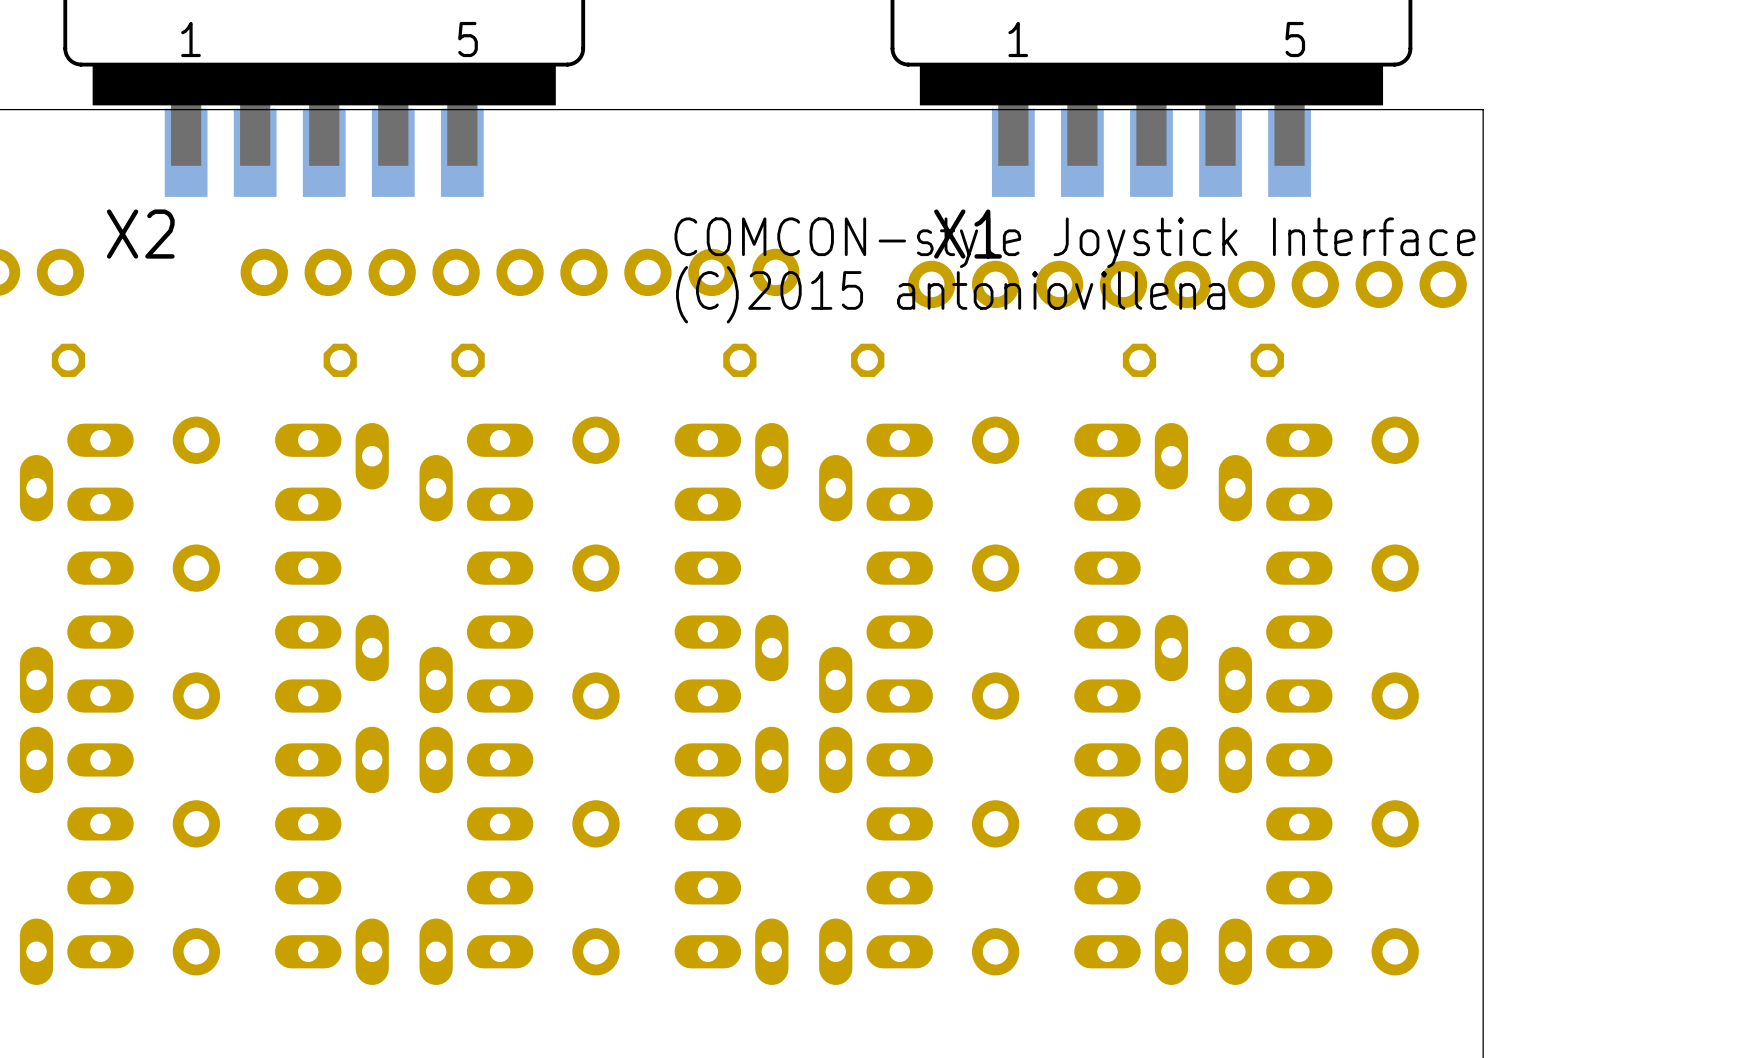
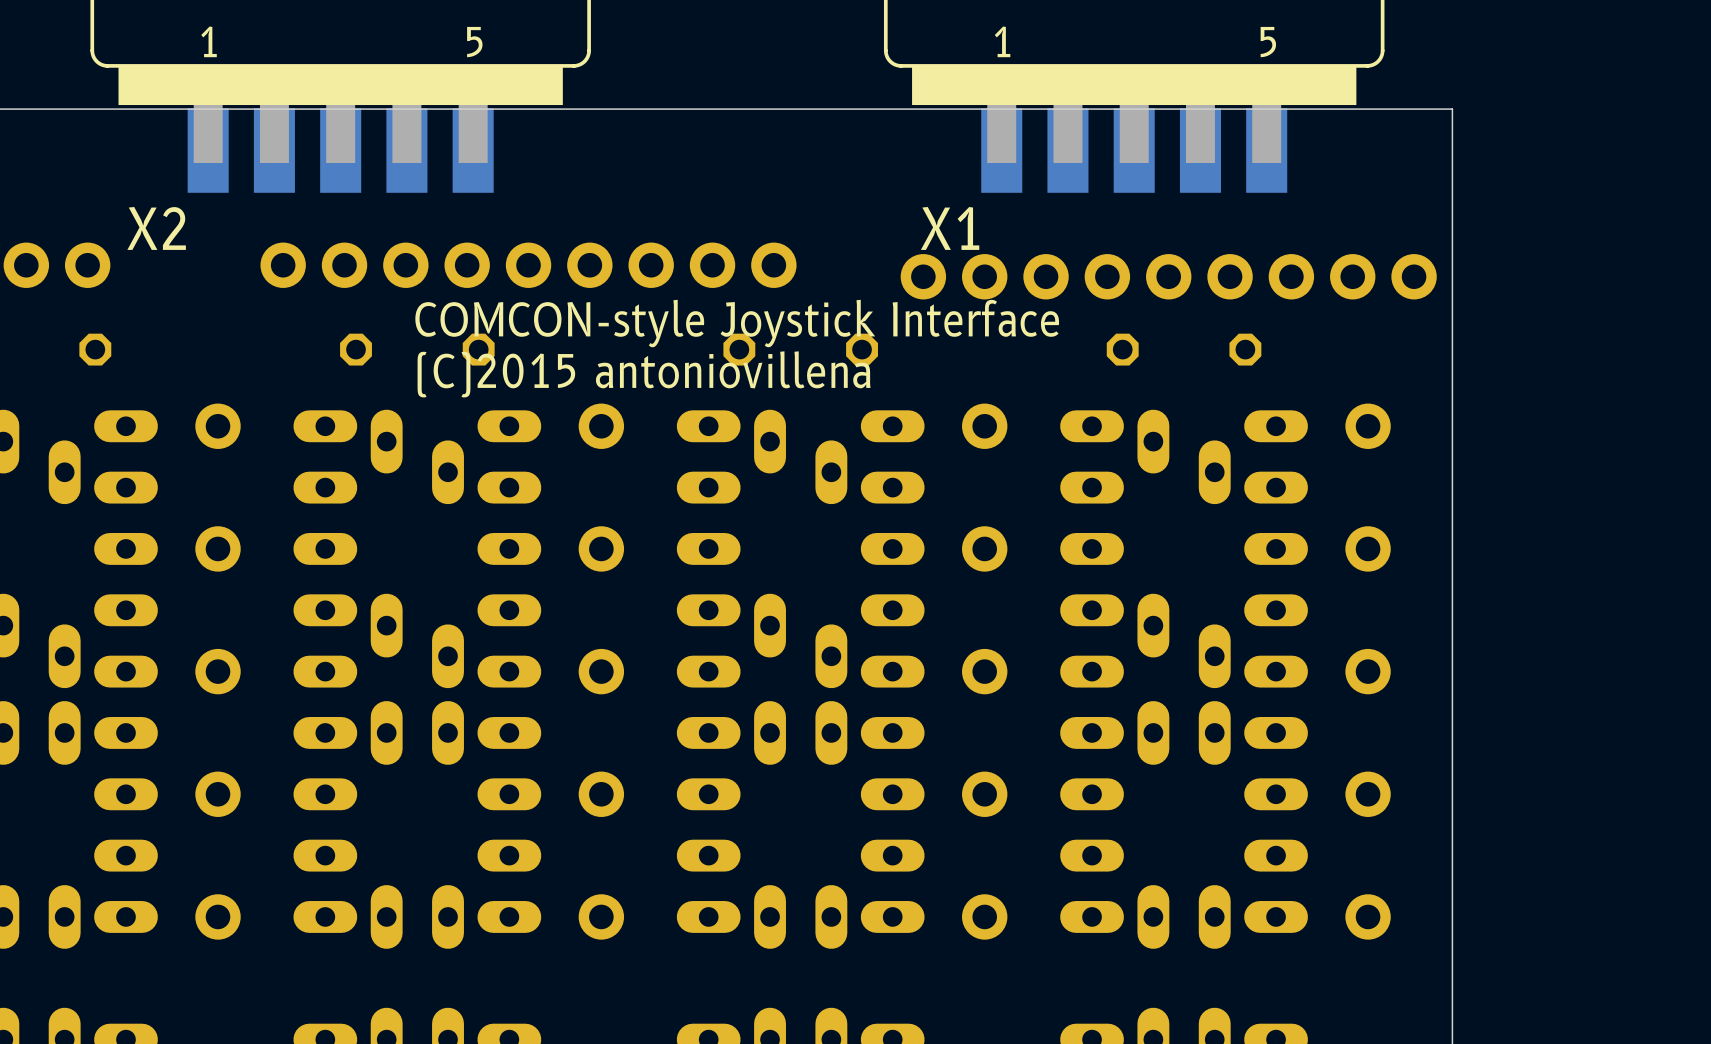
text position: COMCON-style Joystick Interface (1074, 242) -> COMCON-style Joystick Interface (737, 323)
text position: (C)2015 antoniovillena (950, 294) -> (C)2015 antoniovillena (644, 374)

